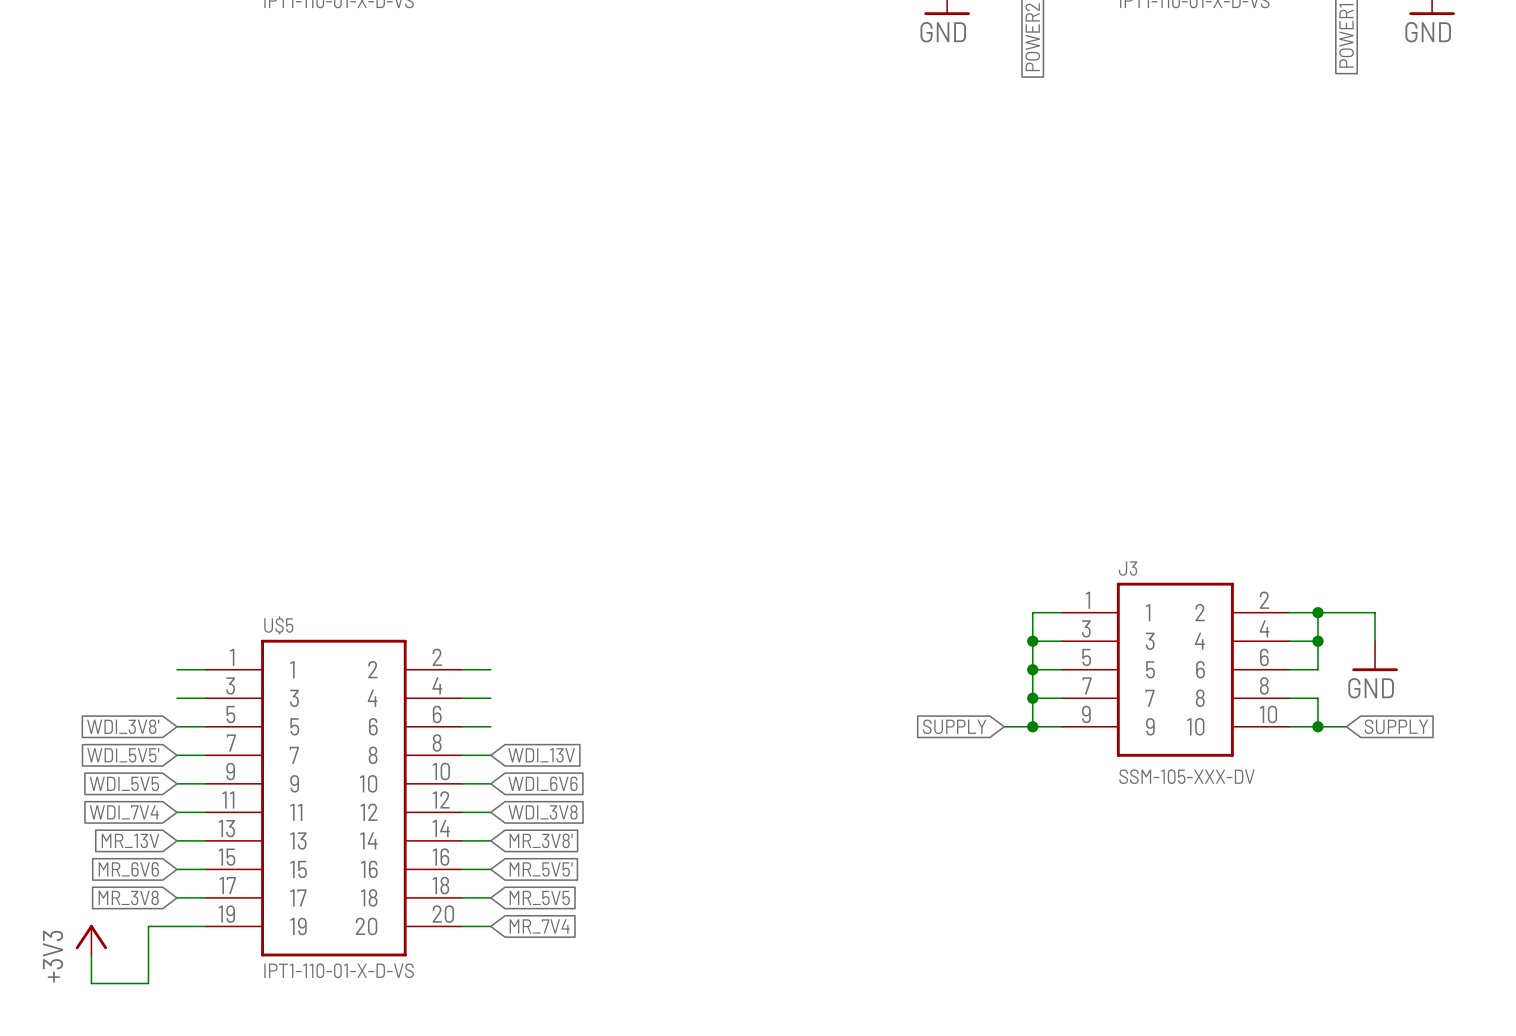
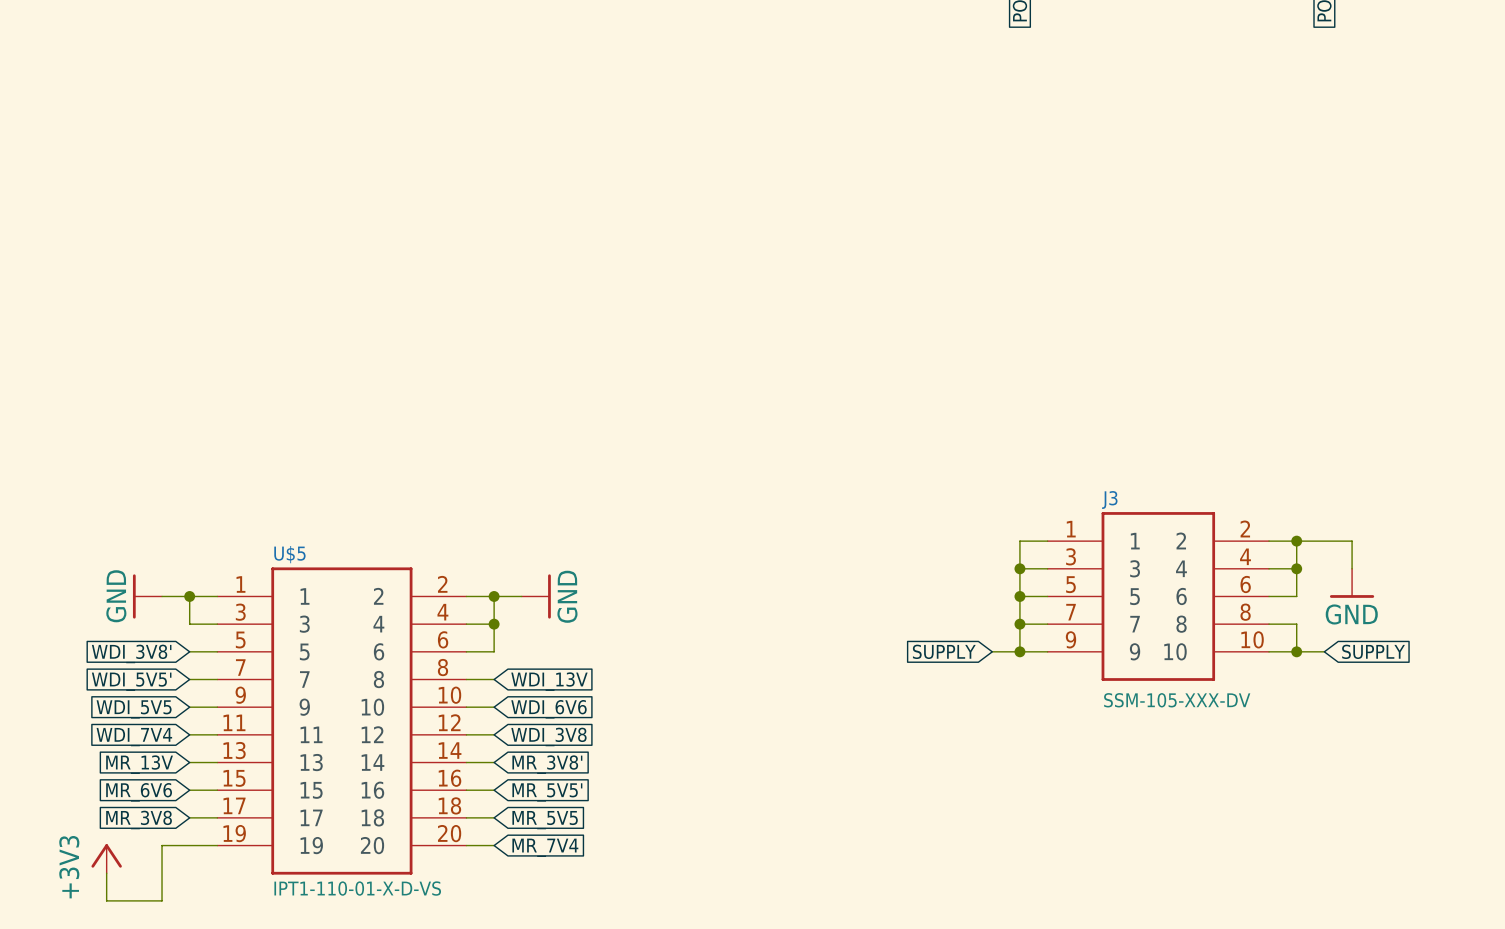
power symbol: none -> GND (147, 596)
wire: none -> (162, 596) (189, 596) (189, 624)
junction: none -> (189, 596)
junction: none -> (494, 596)
wire: none -> (521, 596) (494, 596) (494, 651)
power symbol: none -> GND (536, 596)
junction: none -> (494, 624)

